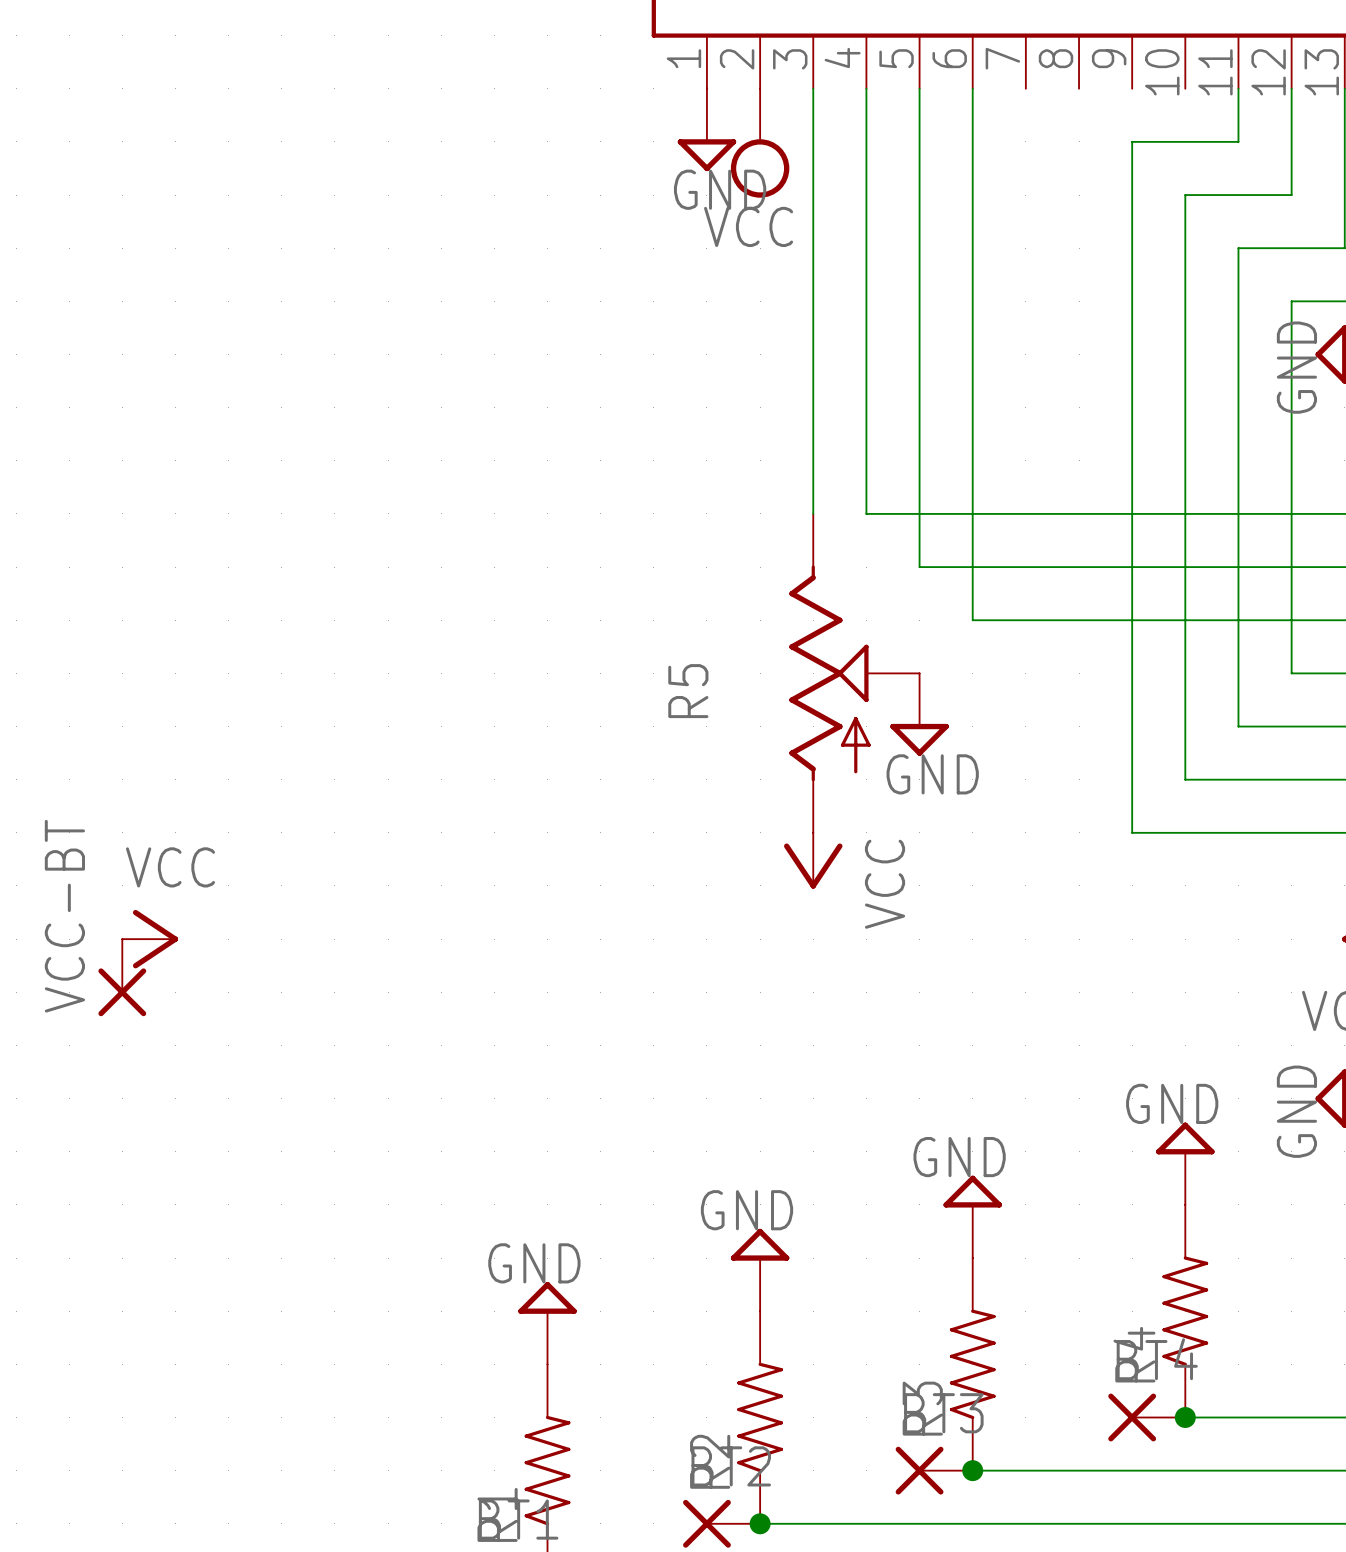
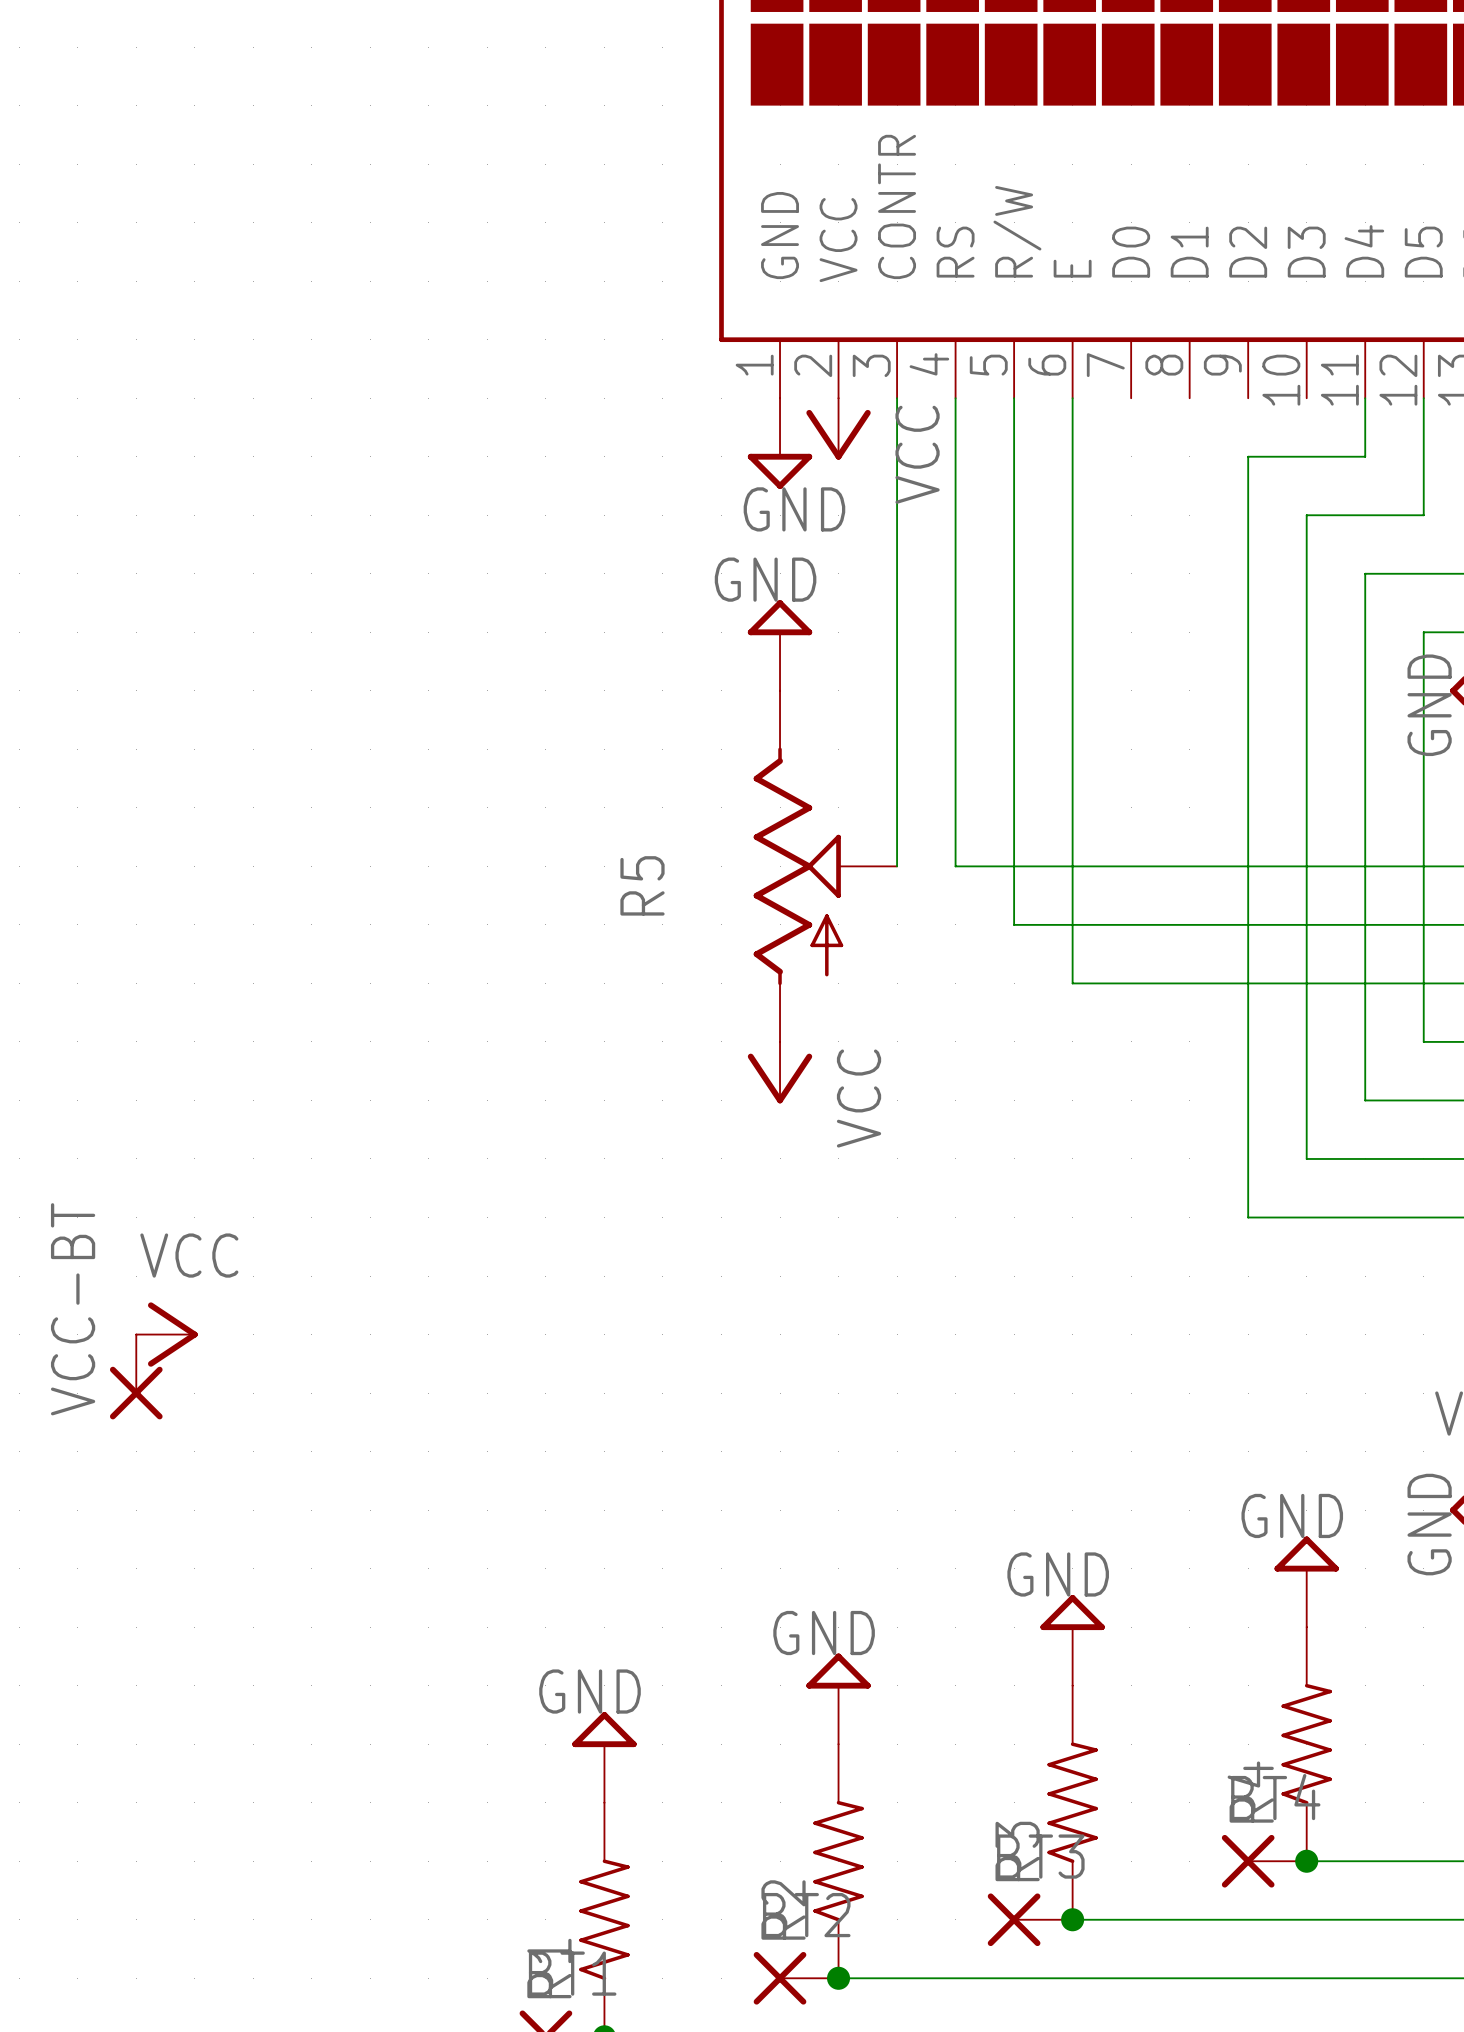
power symbol: none -> VCC (838, 428)
power symbol: VCC (760, 143) -> none
R5 position: (854, 673) -> (825, 866)
power symbol position: GND (919, 714) -> GND (780, 645)
power symbol rotation: 0° (919, 739) -> 180° (780, 617)
power symbol position: VCC (813, 860) -> VCC (780, 1072)

